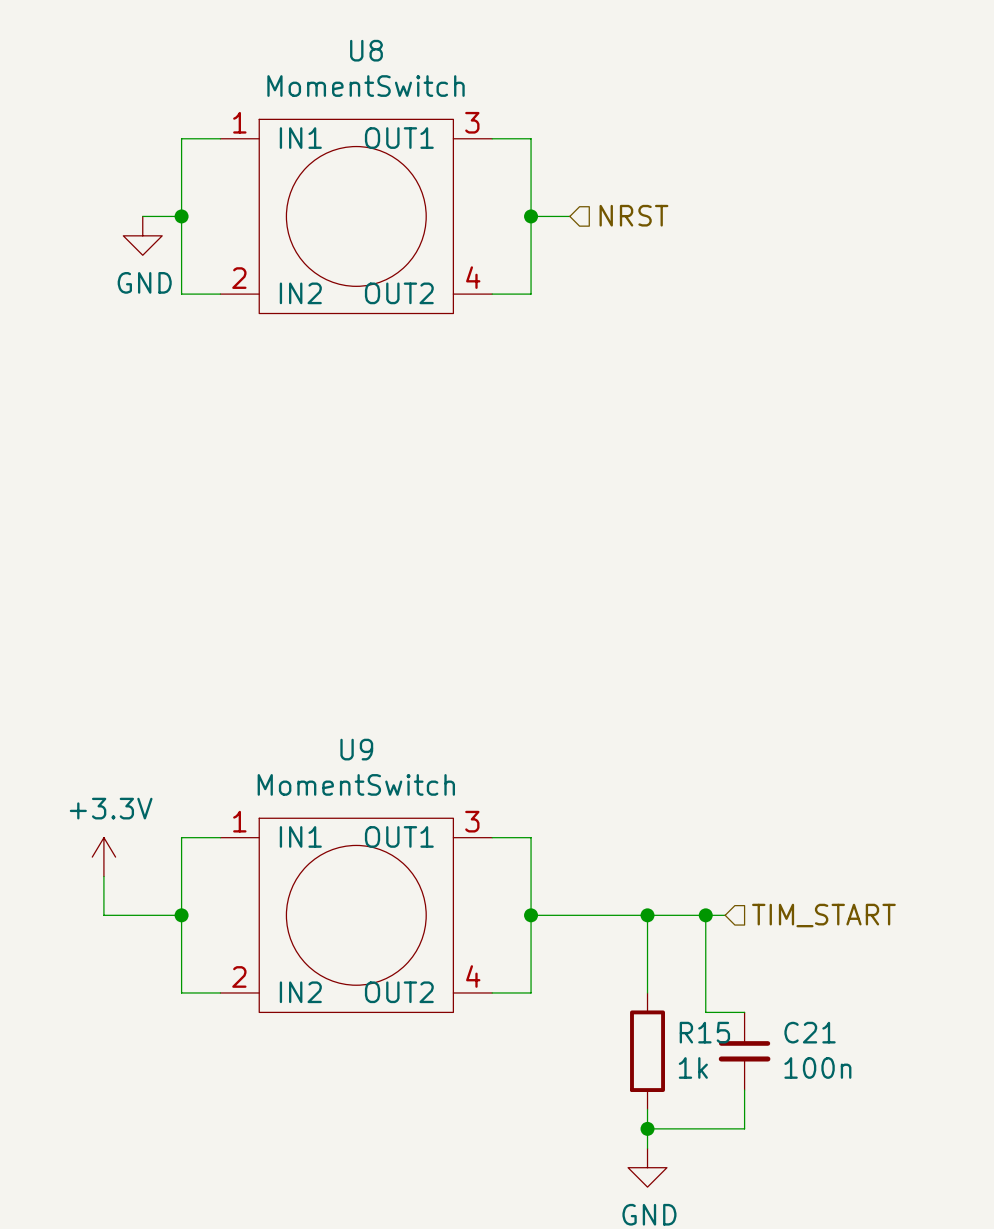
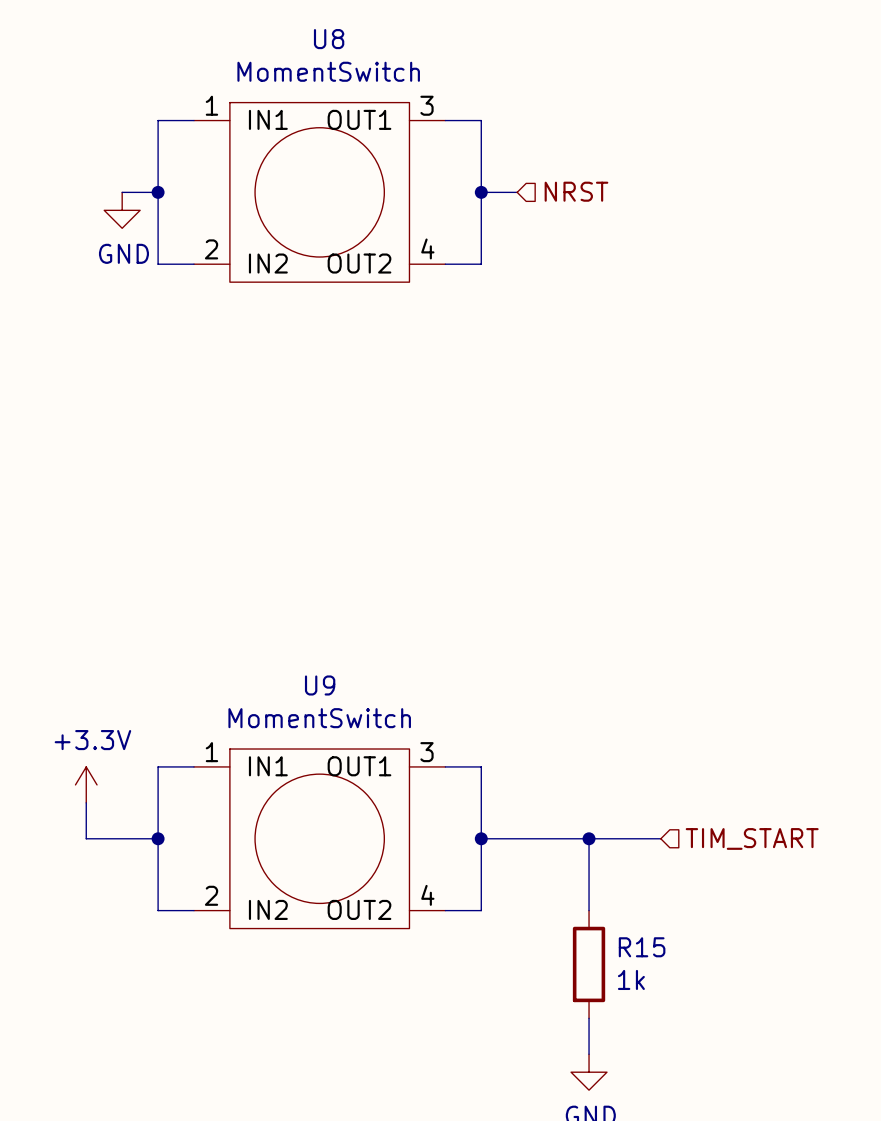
wire: (705, 915) (705, 1012) (744, 1012) -> none
junction: (705, 915) -> none
C21: 100n (744, 1051) -> none
wire: (744, 1090) (744, 1128) (647, 1128) -> none
junction: (647, 1128) -> none

